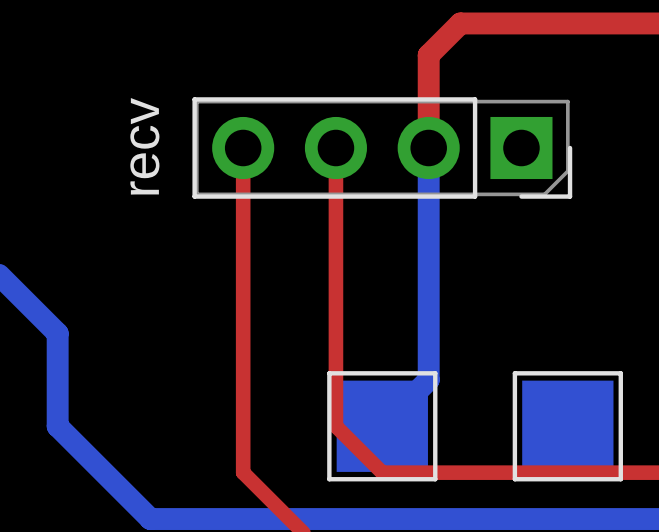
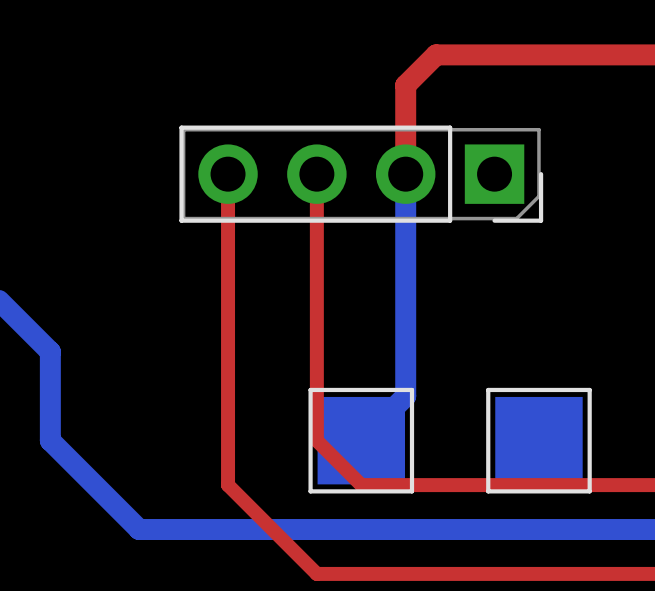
part value: recv (144, 146) -> none

